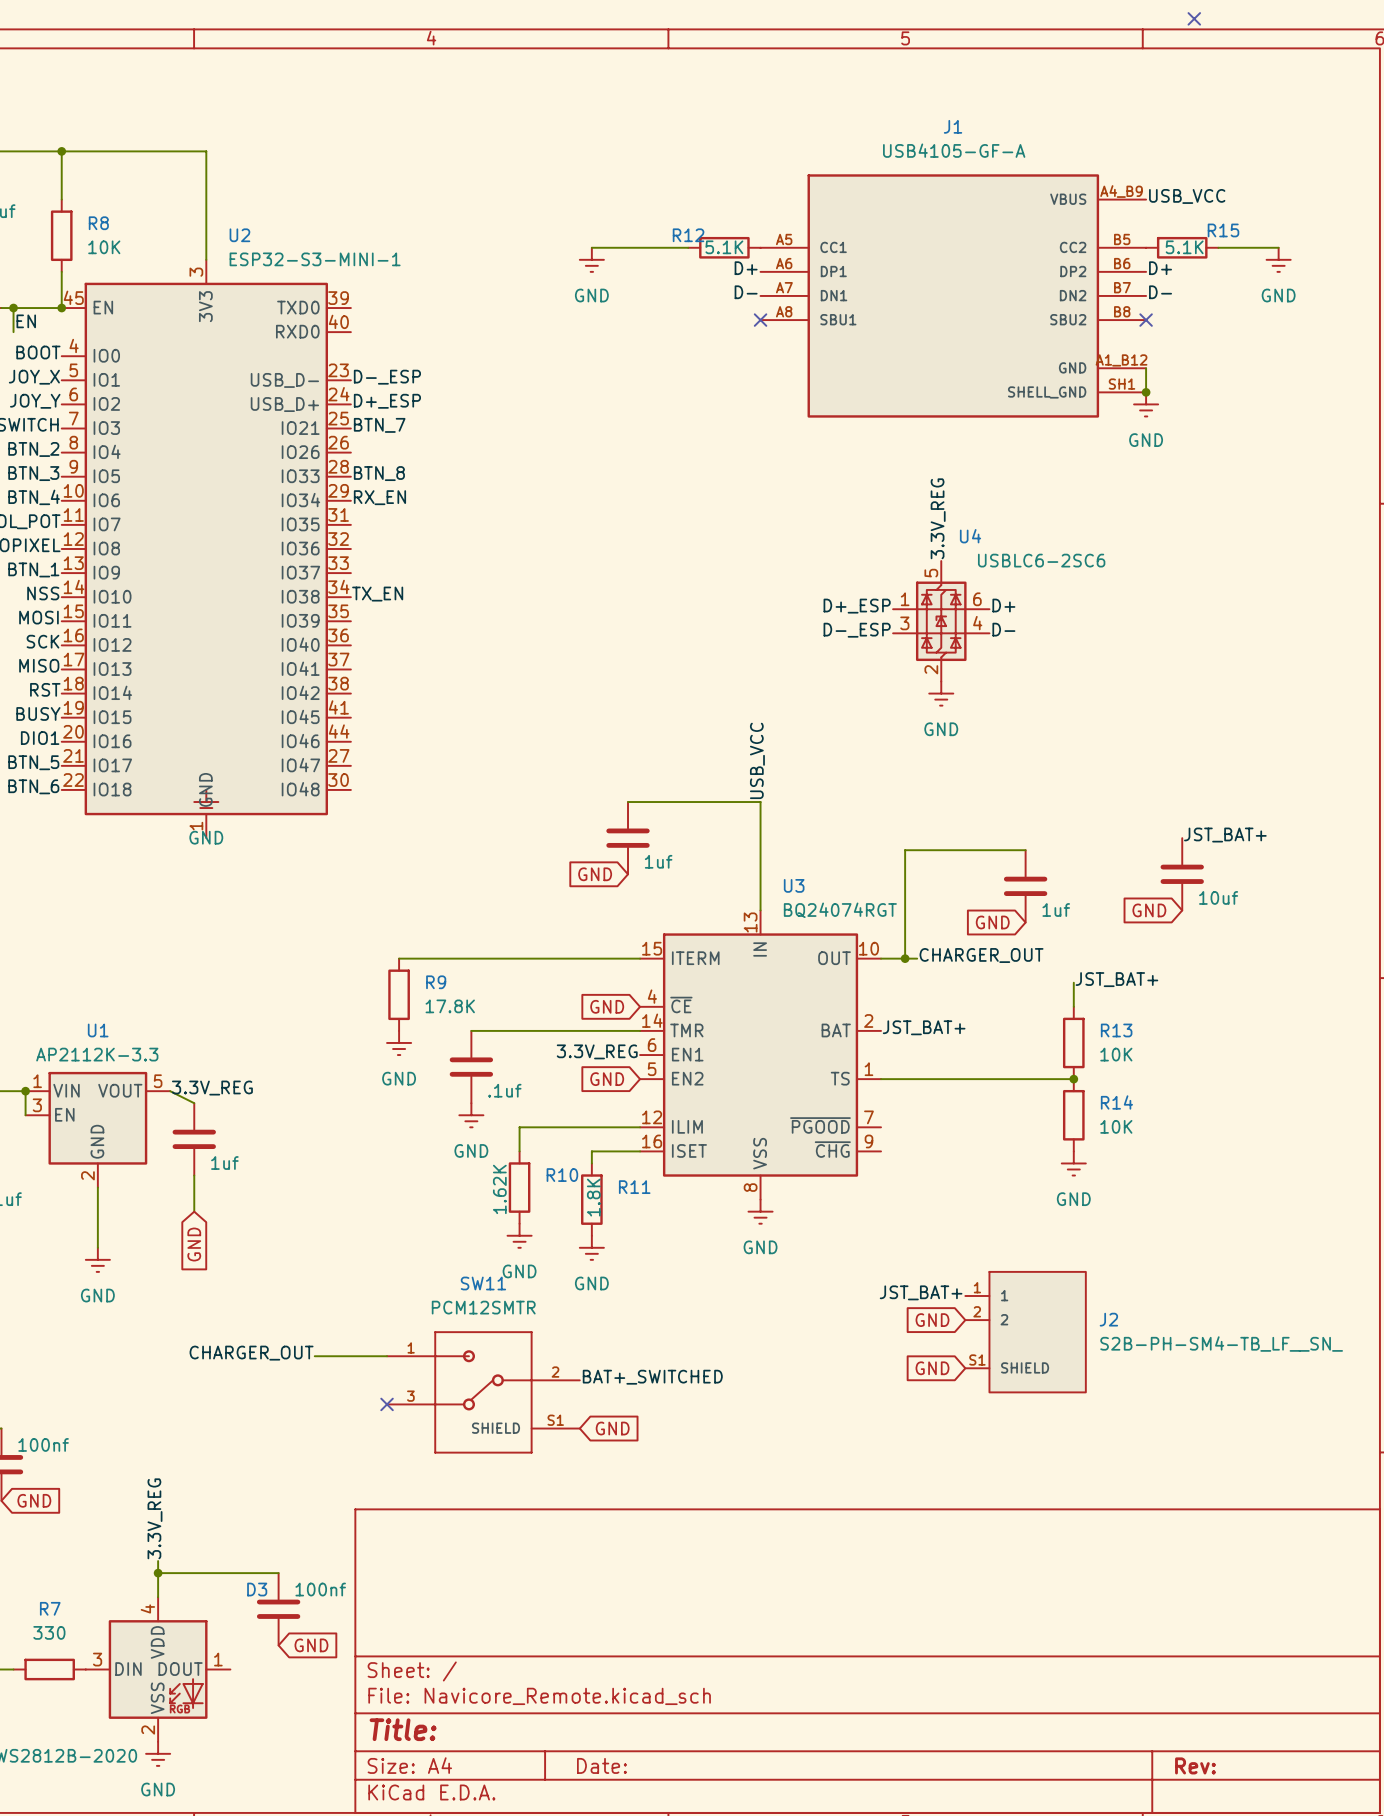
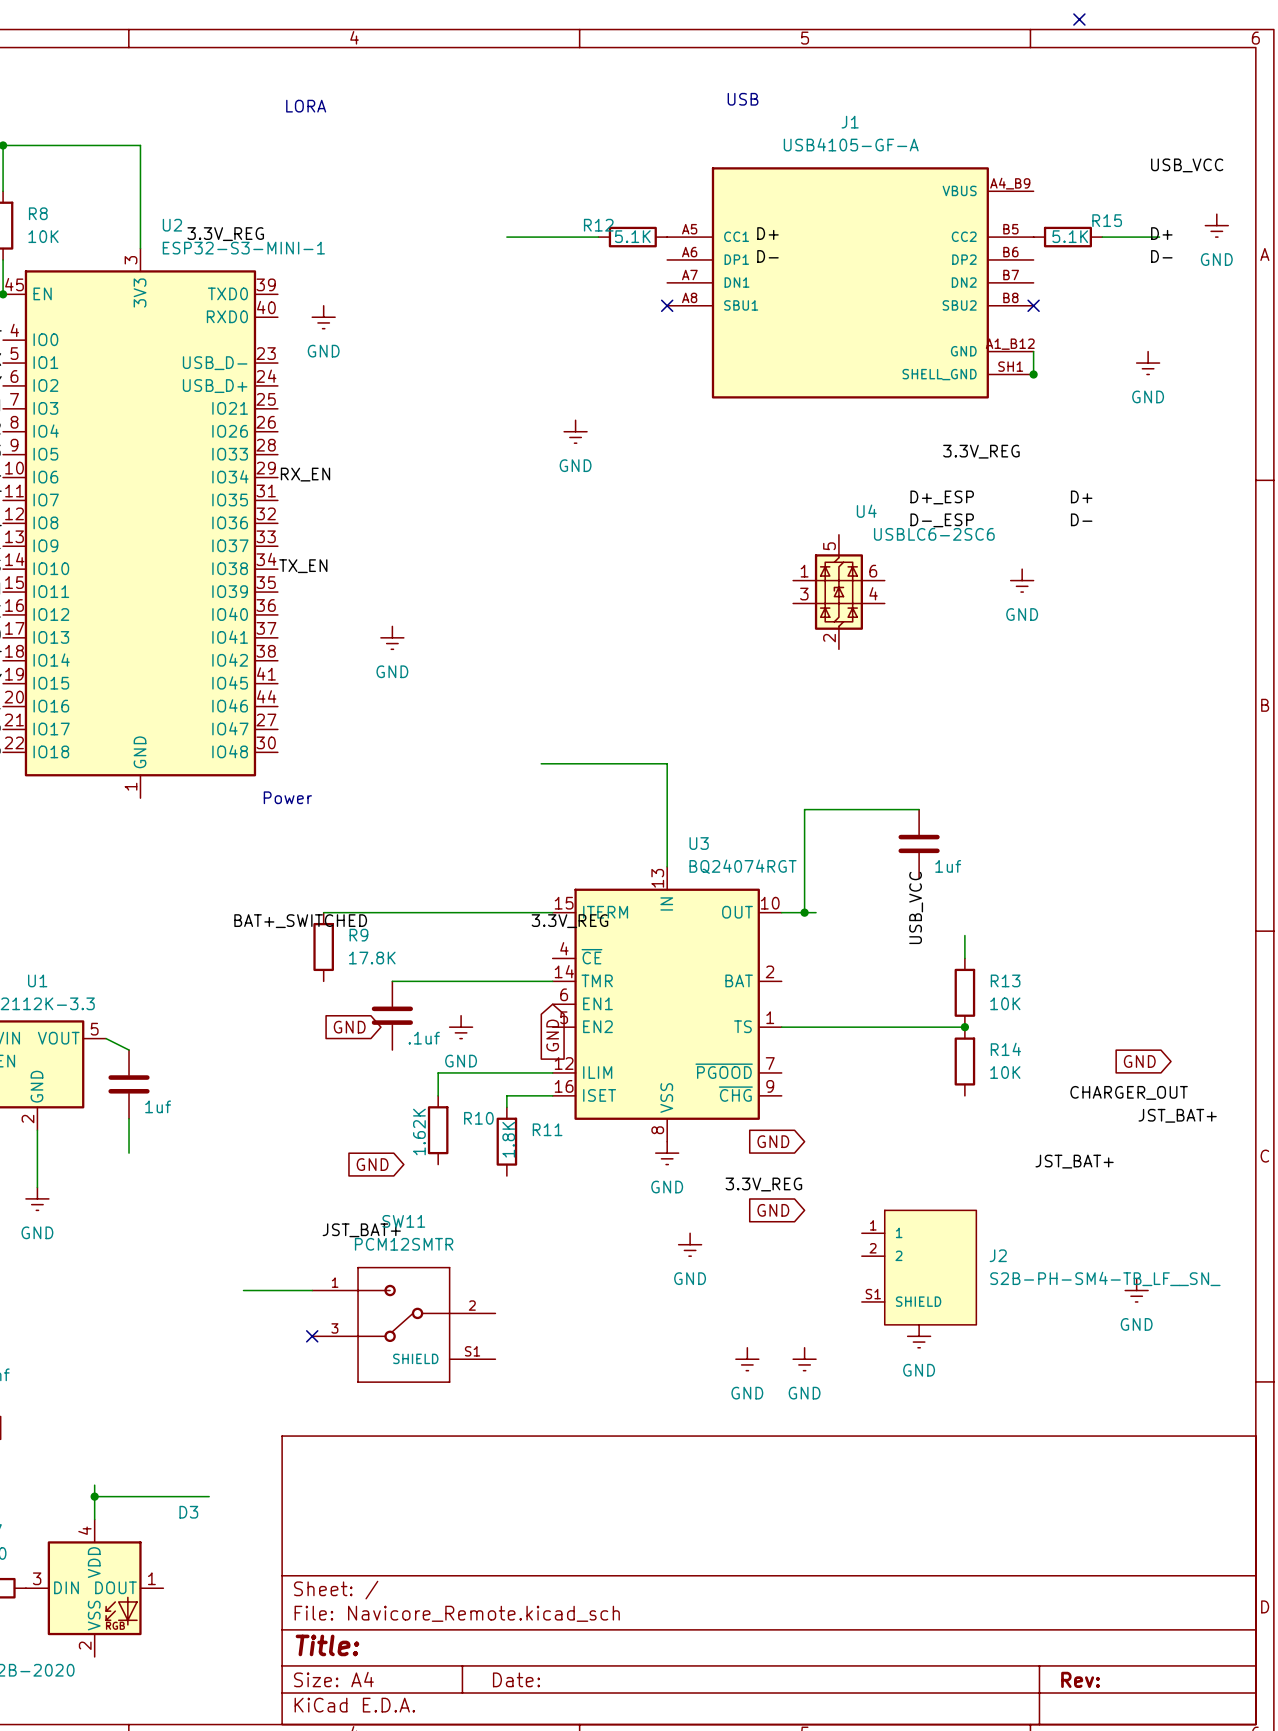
text: none -> USB (743, 99)
text: none -> LORA (306, 106)
label position: USB_VCC (1187, 196) -> USB_VCC (1187, 165)
power symbol: none -> GND (1216, 225)
label: none -> 3.3V_REG (225, 234)
power symbol: GND (591, 259) -> none
power symbol: GND (1278, 259) -> none
label position: D+ (746, 268) -> D+ (767, 233)
label position: D+ (1160, 268) -> D+ (1161, 233)
label position: D- (746, 292) -> D- (767, 256)
label position: D- (1160, 292) -> D- (1161, 256)
power symbol: none -> GND (323, 317)
label: D-_ESP (387, 377) -> none
power symbol: none -> GND (1148, 363)
label: D+_ESP (387, 401) -> none
power symbol: GND (1146, 404) -> none
label: BTN_7 (379, 425) -> none
power symbol: none -> GND (575, 431)
label: BTN_8 (379, 473) -> none
label rotation: 0° (938, 518) -> 90° clockwise (981, 451)
label position: 3.3V_REG (938, 518) -> 3.3V_REG (981, 451)
label: none -> D+ (1081, 496)
label: none -> D- (1081, 519)
label: D+ (1003, 605) -> none
label position: D+_ESP (857, 606) -> D+_ESP (942, 497)
power symbol: none -> GND (1022, 580)
label: D- (1003, 629) -> none
label position: D-_ESP (857, 630) -> D-_ESP (942, 520)
power symbol: none -> GND (392, 637)
power symbol: GND (941, 693) -> none
label: USB_VCC (757, 760) -> none
power symbol: GND (206, 802) -> none
label: JST_BAT+ (1225, 835) -> none
text: none -> Power (287, 797)
part: 1uf (628, 838) -> none
global label: GND (595, 874) -> none
part: 10uf (1182, 874) -> none
global label: GND (1149, 910) -> none
global label: GND (992, 922) -> none
label: none -> USB_VCC (916, 907)
label: CHARGER_OUT (981, 955) -> none
label: none -> BAT+_SWITCHED (300, 921)
label: JST_BAT+ (1116, 979) -> none
global label: GND (607, 1006) -> none
label: JST_BAT+ (924, 1027) -> none
power symbol: GND (399, 1042) -> none
label position: 3.3V_REG (597, 1051) -> 3.3V_REG (569, 921)
global label: none -> GND (349, 1027)
power symbol: none -> GND (461, 1027)
global label rotation: 0° (607, 1079) -> 90° counterclockwise (552, 1035)
label: 3.3V_REG (212, 1088) -> none
power symbol: GND (471, 1115) -> none
global label: none -> GND (1139, 1061)
label: none -> CHARGER_OUT (1129, 1092)
power symbol: GND (1073, 1163) -> none
label: none -> JST_BAT+ (1177, 1115)
global label: none -> GND (773, 1141)
label: none -> JST_BAT+ (1074, 1161)
global label: none -> GND (372, 1164)
power symbol: GND (519, 1235) -> none
global label: GND (194, 1244) -> none
label: none -> 3.3V_REG (763, 1184)
power symbol: GND (591, 1247) -> none
global label: none -> GND (773, 1210)
label: none -> JST_BAT+ (361, 1230)
label: JST_BAT+ (921, 1292) -> none
power symbol: none -> GND (690, 1244)
global label: GND (932, 1320) -> none
label: CHARGER_OUT (251, 1353) -> none
power symbol: none -> GND (1136, 1290)
global label: GND (932, 1368) -> none
label: BAT+_SWITCHED (652, 1377) -> none
power symbol: none -> GND (919, 1336)
global label: GND (612, 1428) -> none
power symbol: none -> GND (747, 1359)
power symbol: none -> GND (804, 1359)
label: 3.3V_REG (154, 1518) -> none
part: 100nf (278, 1609) -> none
global label: GND (311, 1645) -> none
power symbol: GND (158, 1753) -> none

